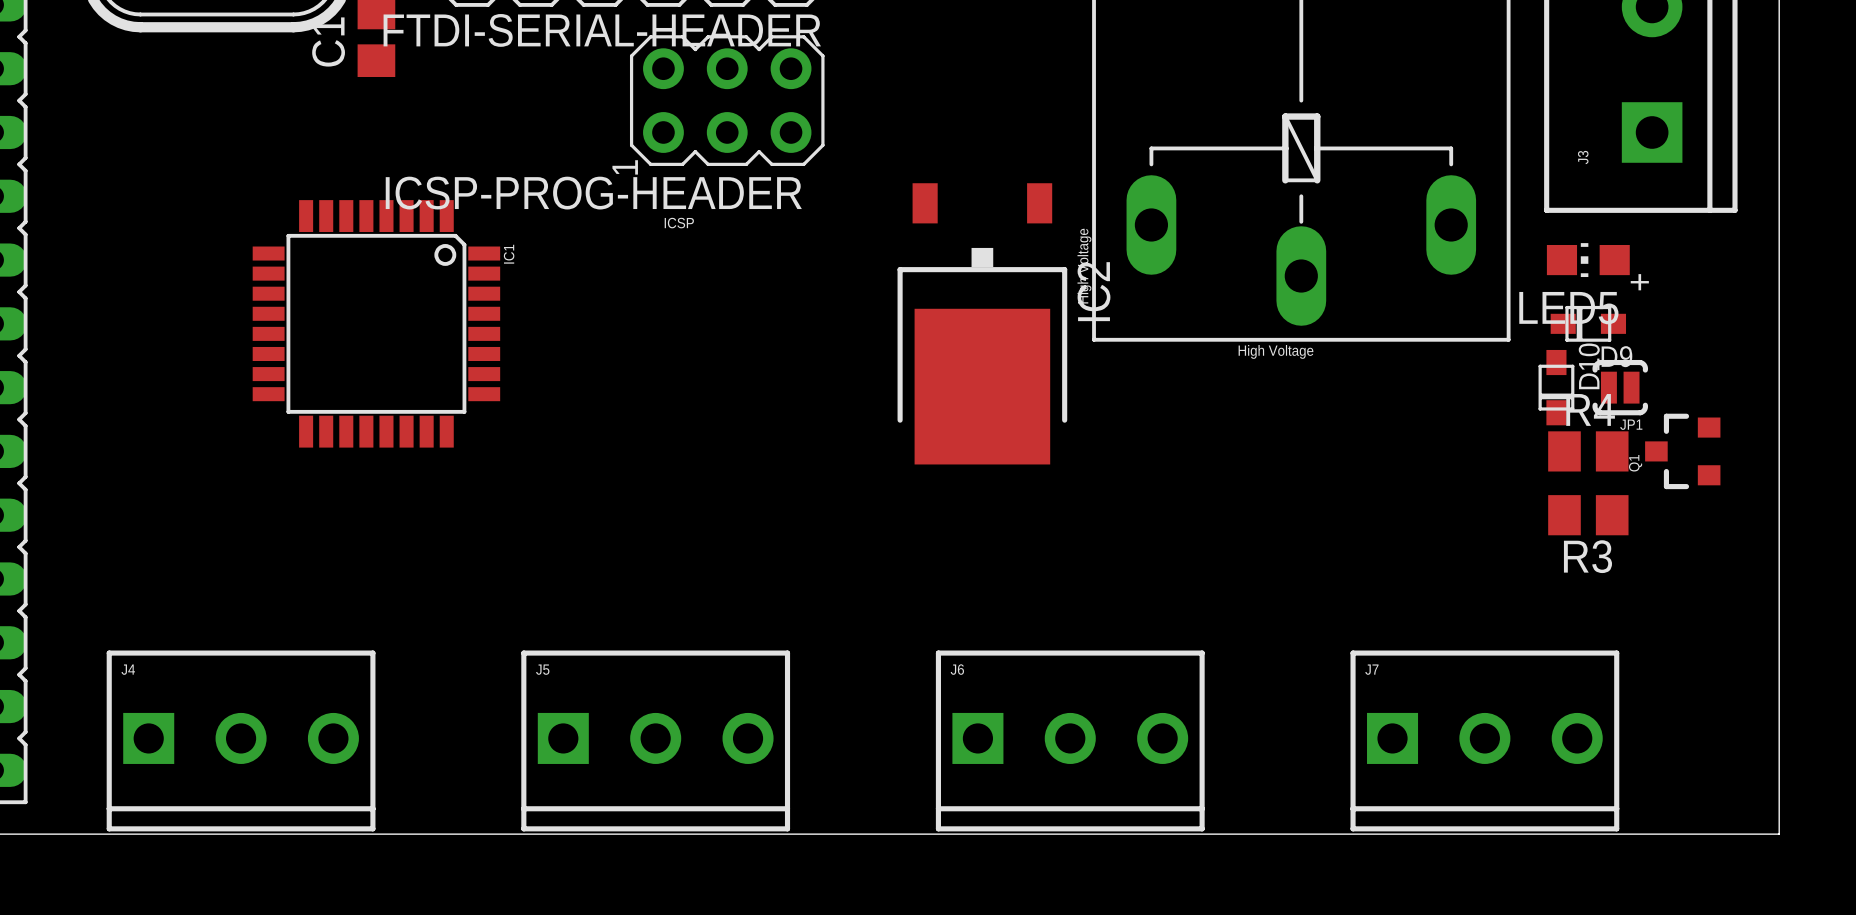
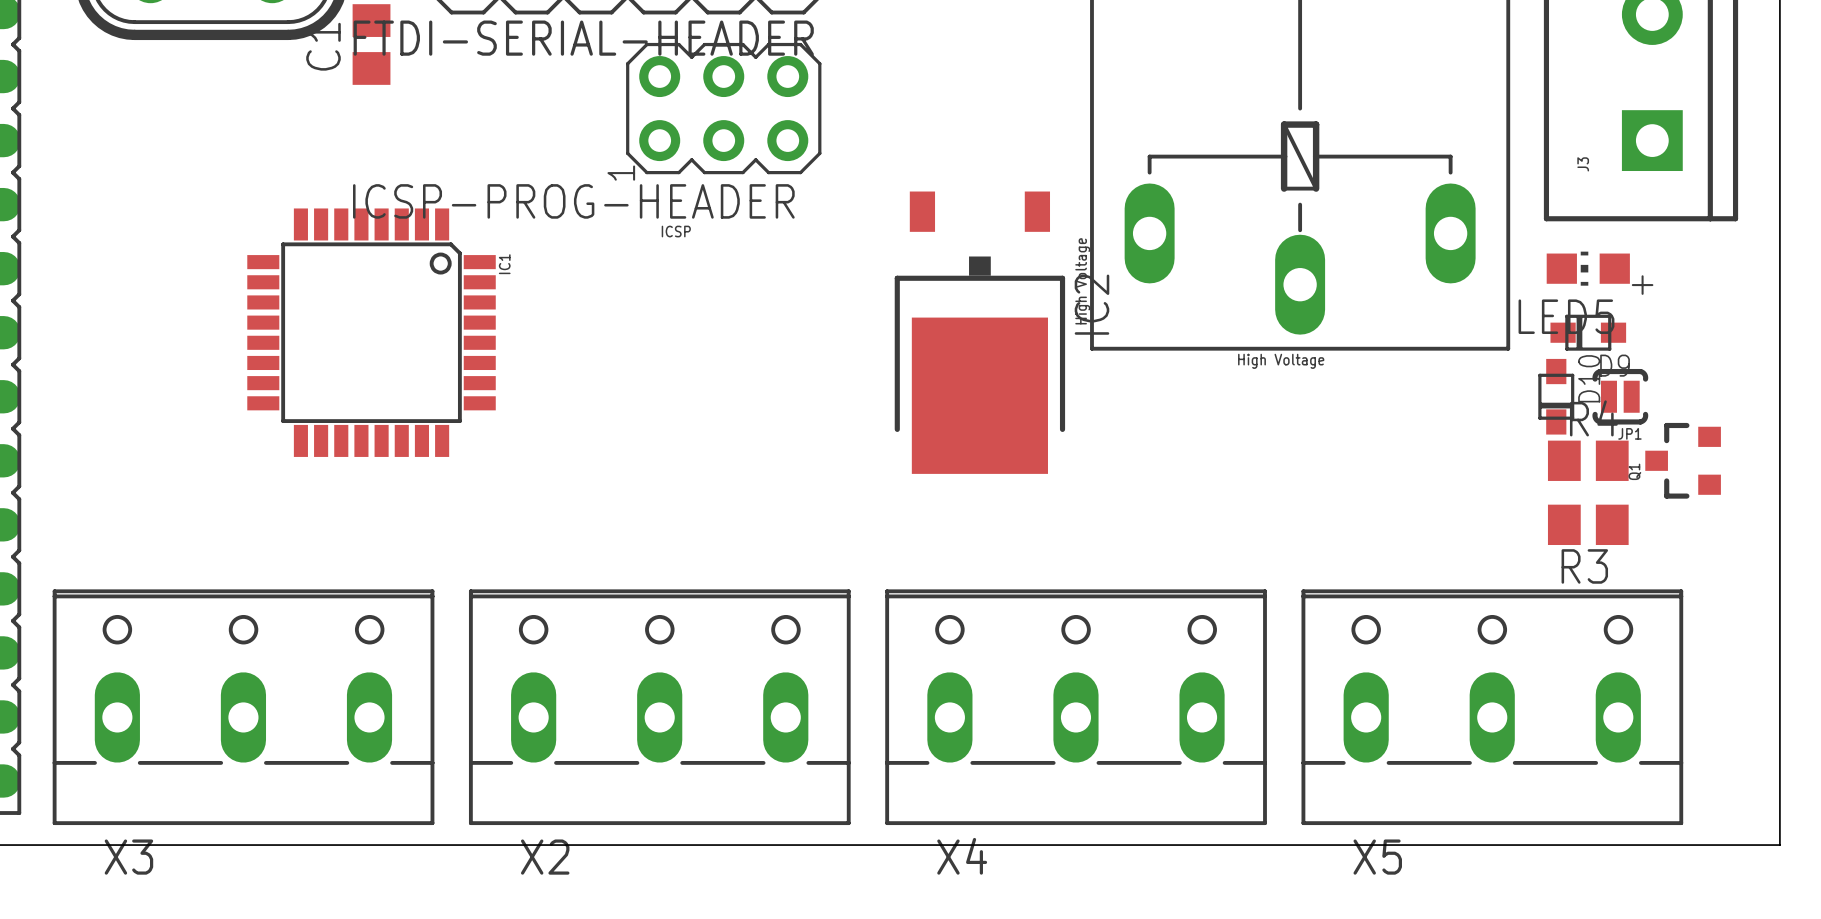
X3: none -> (243, 707)
X2: none -> (659, 707)
X4: none -> (1076, 707)
X5: none -> (1492, 707)
J4: (241, 740) -> none
J5: (655, 740) -> none
J6: (1070, 740) -> none
J7: (1484, 740) -> none

